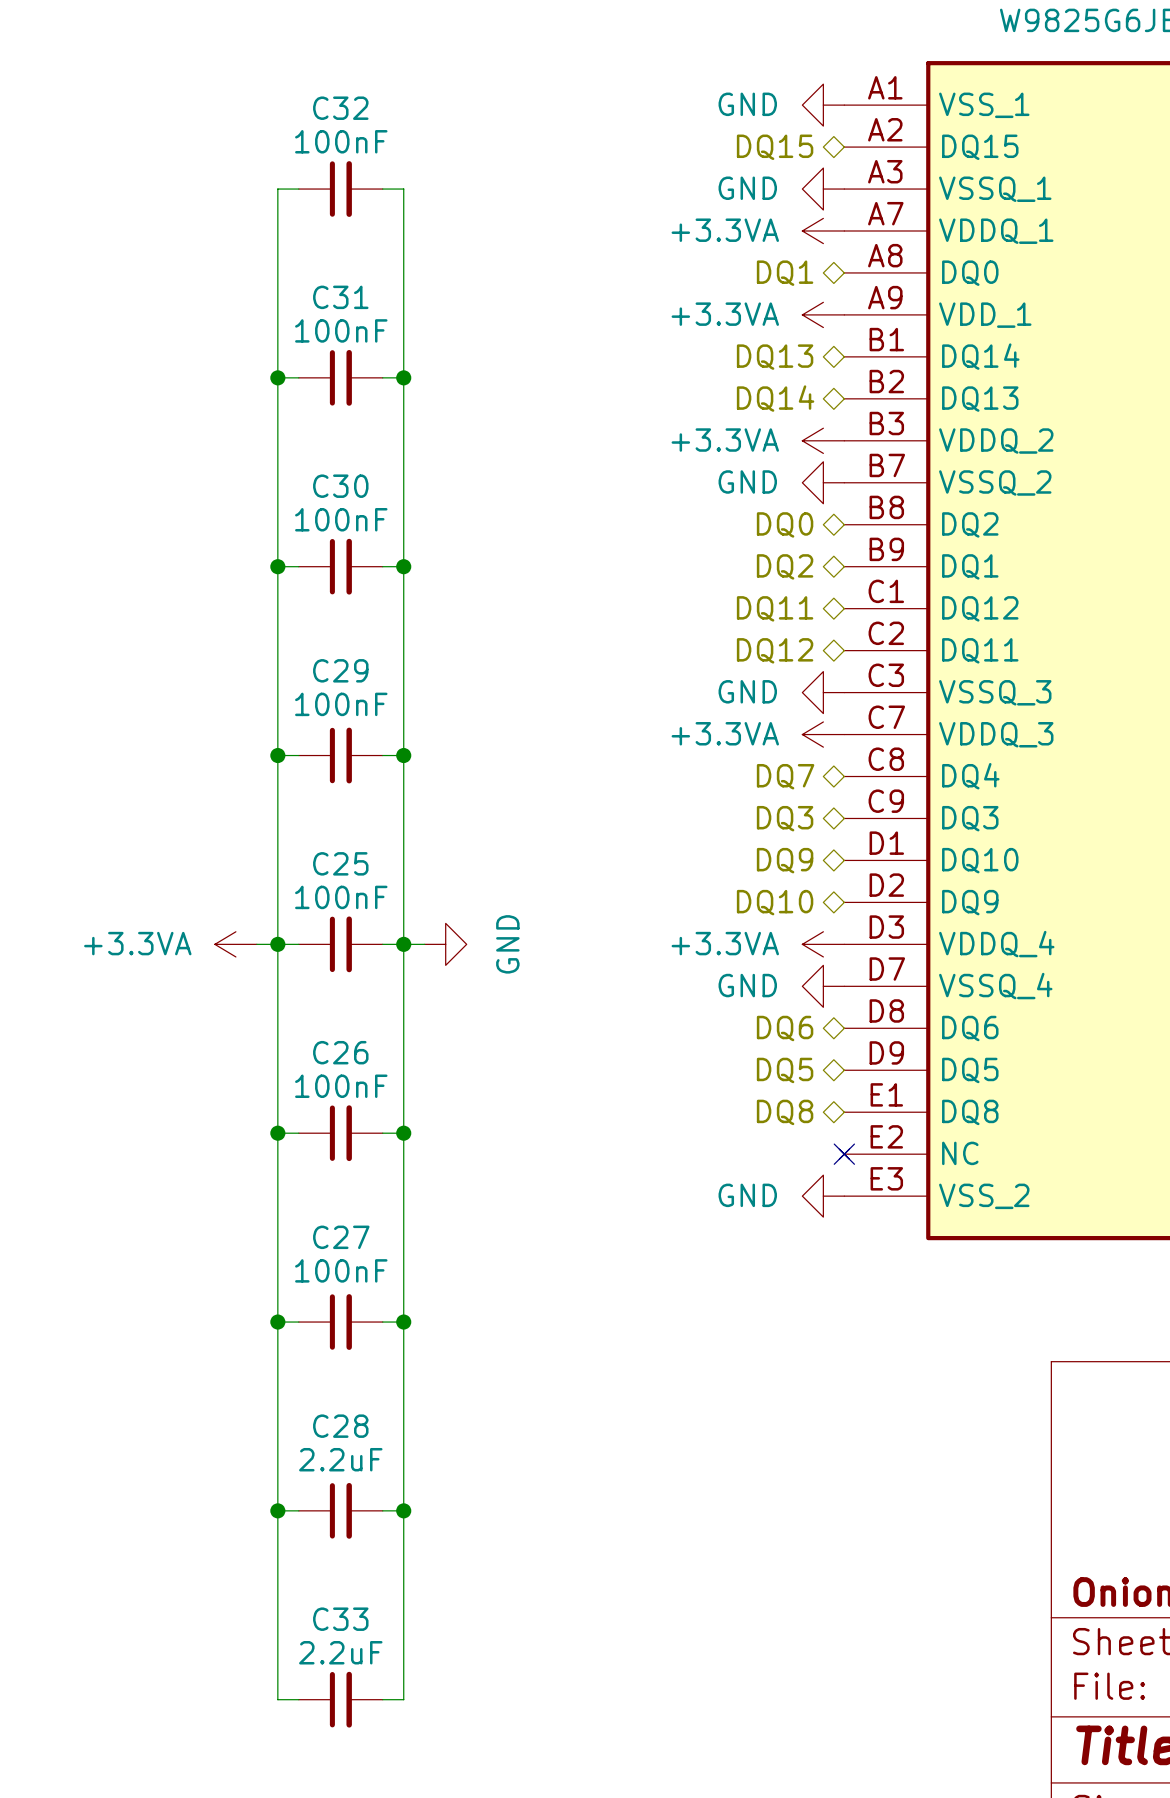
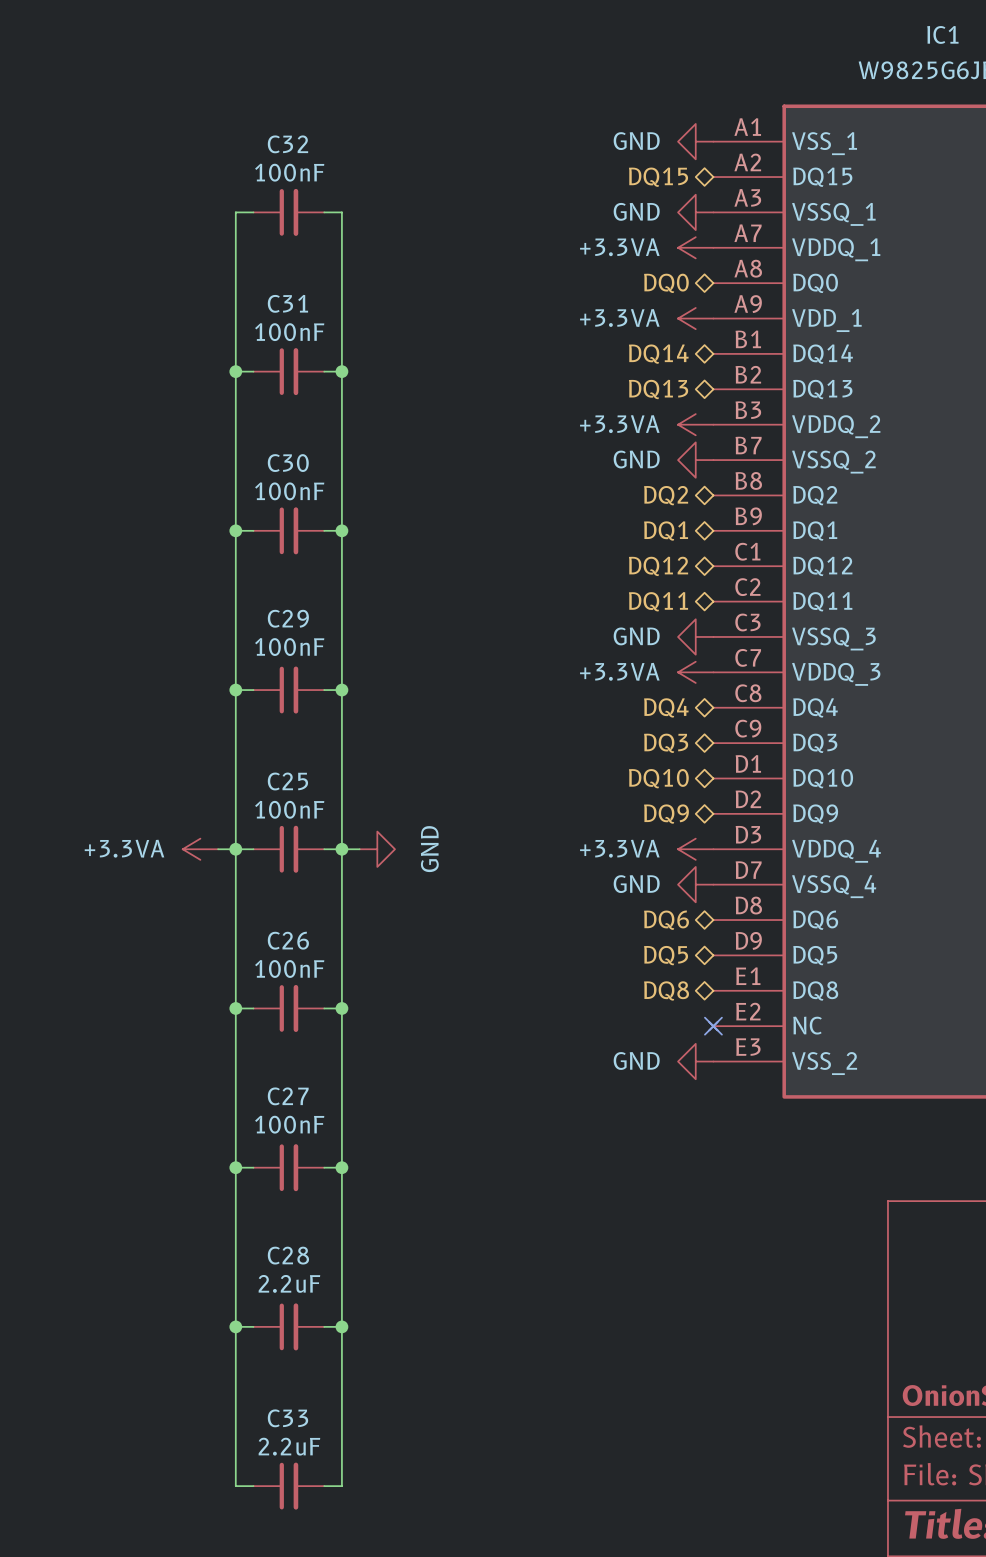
hierarchical label: DQ1 (785, 273) -> DQ0 (666, 283)
hierarchical label: DQ13 (775, 357) -> DQ14 (658, 354)
hierarchical label: DQ14 (775, 398) -> DQ13 (658, 389)
hierarchical label: DQ0 (785, 524) -> DQ2 (666, 495)
hierarchical label: DQ2 (785, 566) -> DQ1 (666, 531)
hierarchical label: DQ11 (775, 608) -> DQ12 (658, 566)
hierarchical label: DQ12 (775, 650) -> DQ11 (658, 601)
hierarchical label: DQ7 (785, 776) -> DQ4 (666, 707)
hierarchical label: DQ9 (785, 860) -> DQ10 (658, 778)
hierarchical label: DQ10 (775, 902) -> DQ9 (666, 814)

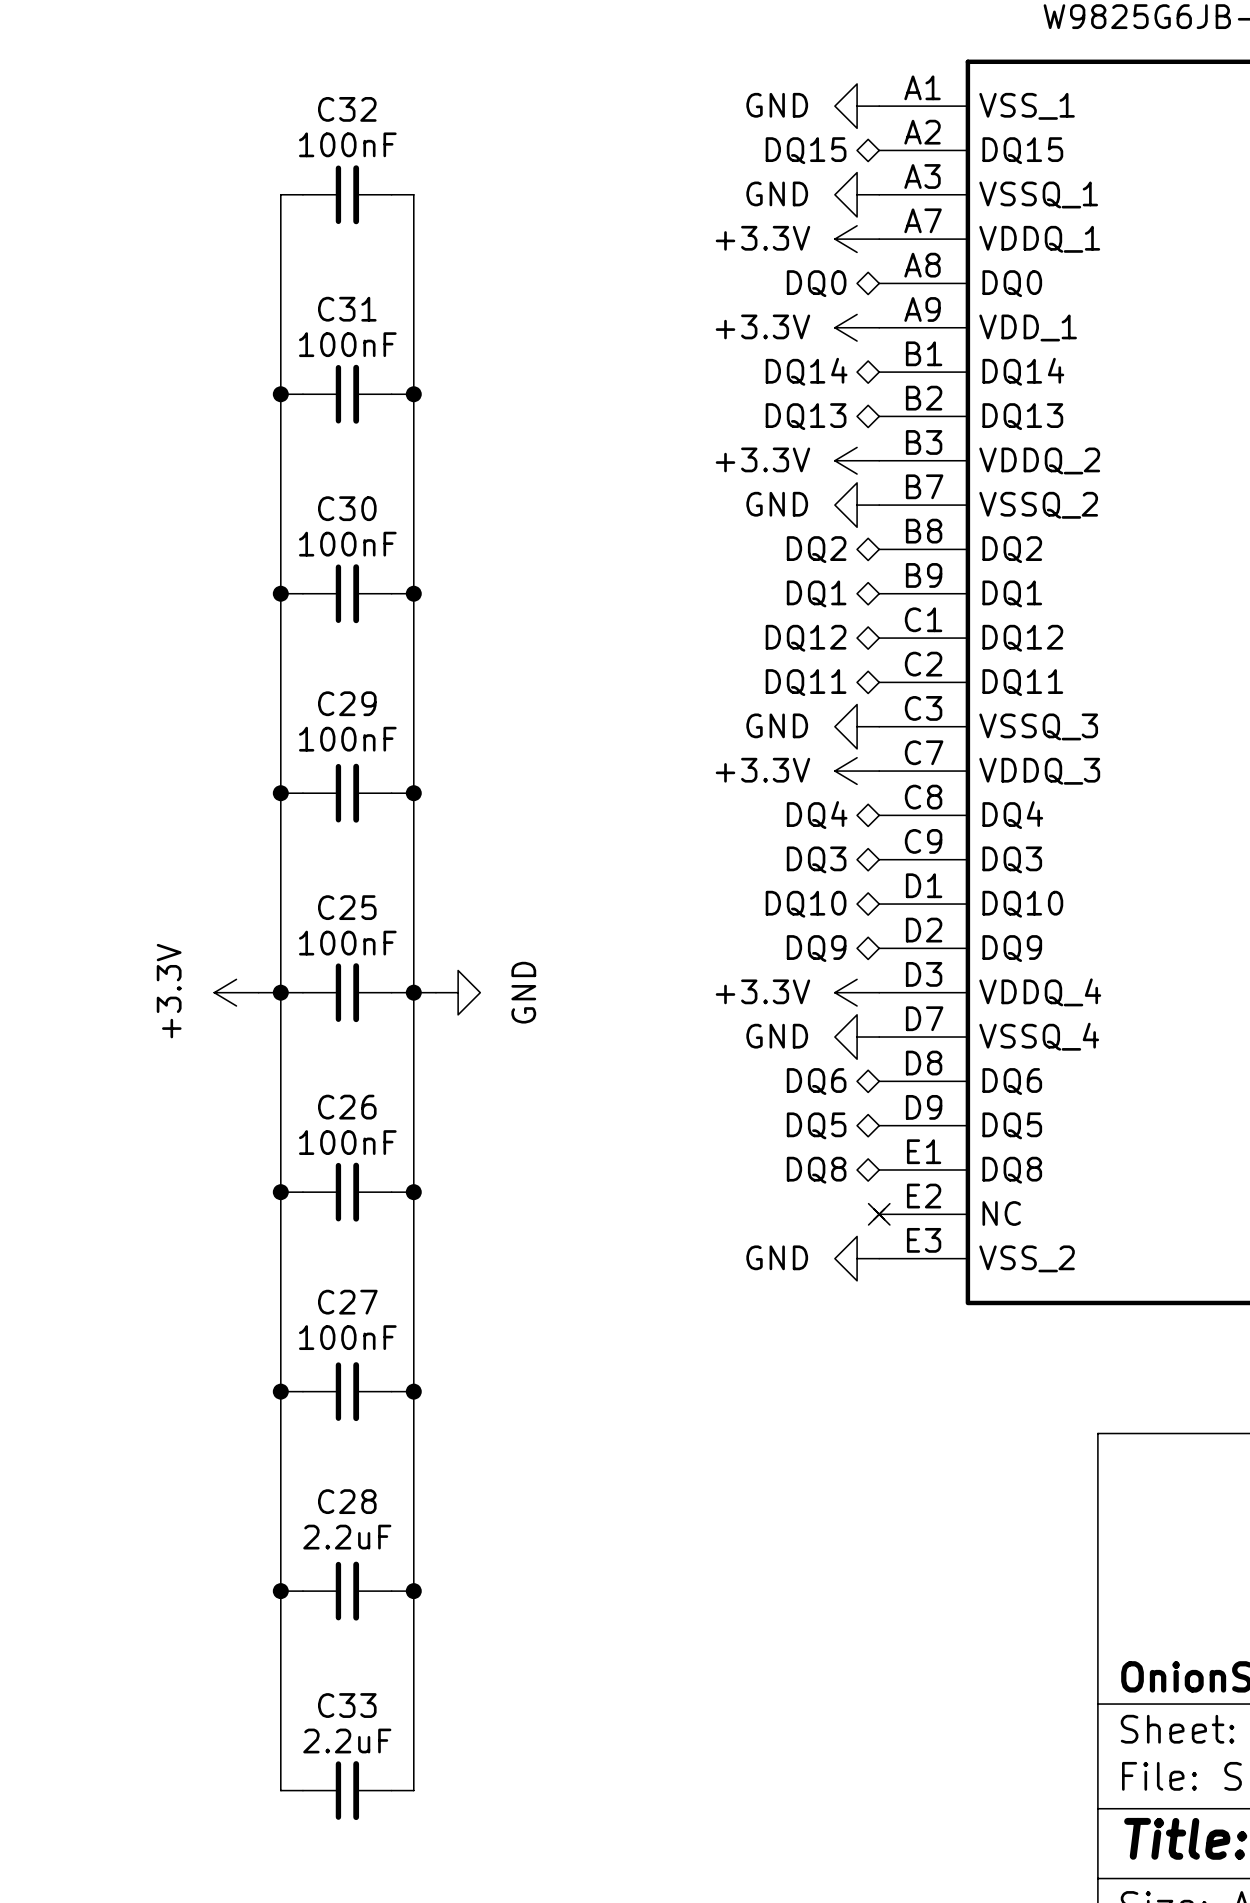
power symbol: +3.3VA (695, 247) -> +3.3V (857, 239)
power symbol: +3.3VA (695, 318) -> +3.3V (857, 327)
power symbol: +3.3VA (695, 424) -> +3.3V (857, 460)
power symbol: +3.3VA (695, 672) -> +3.3V (857, 771)
power symbol: +3.3VA (200, 849) -> +3.3V (236, 992)
power symbol: +3.3VA (695, 849) -> +3.3V (857, 992)

